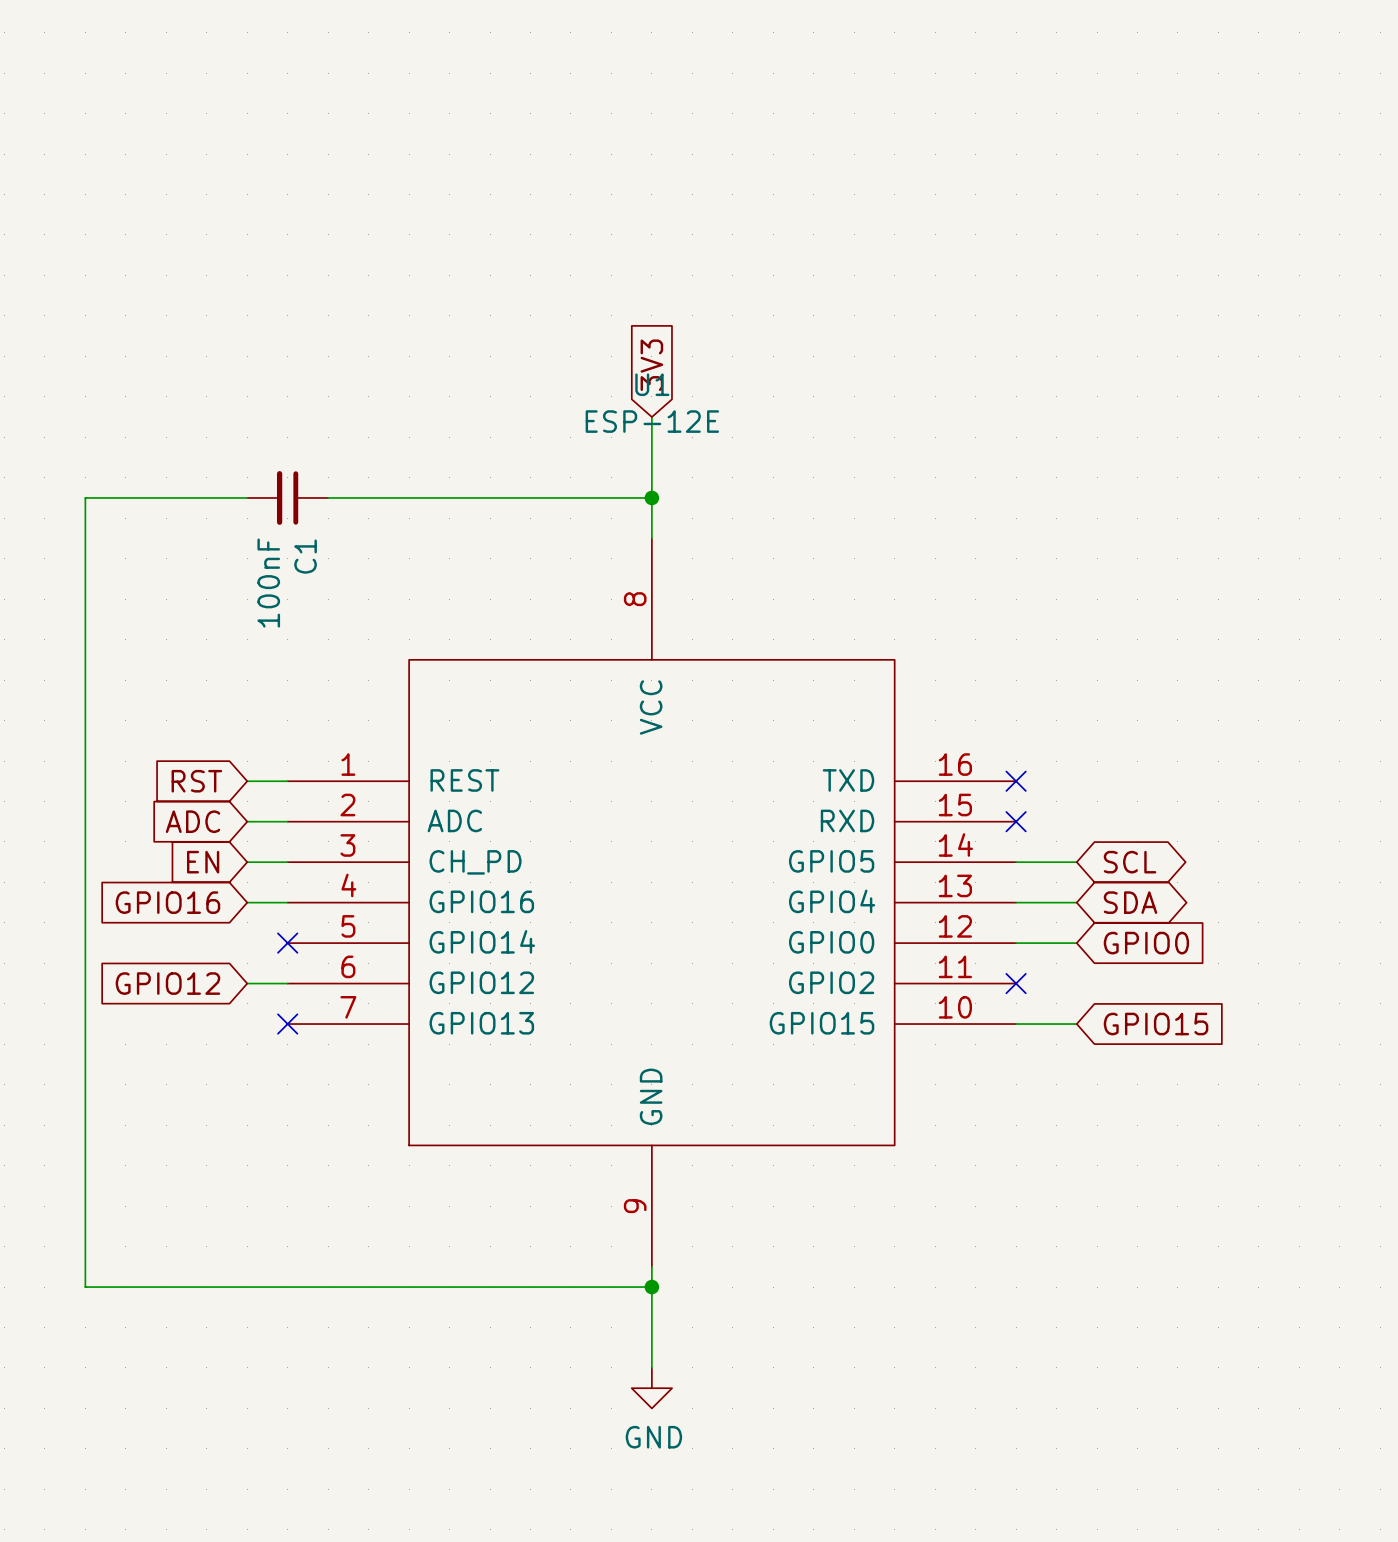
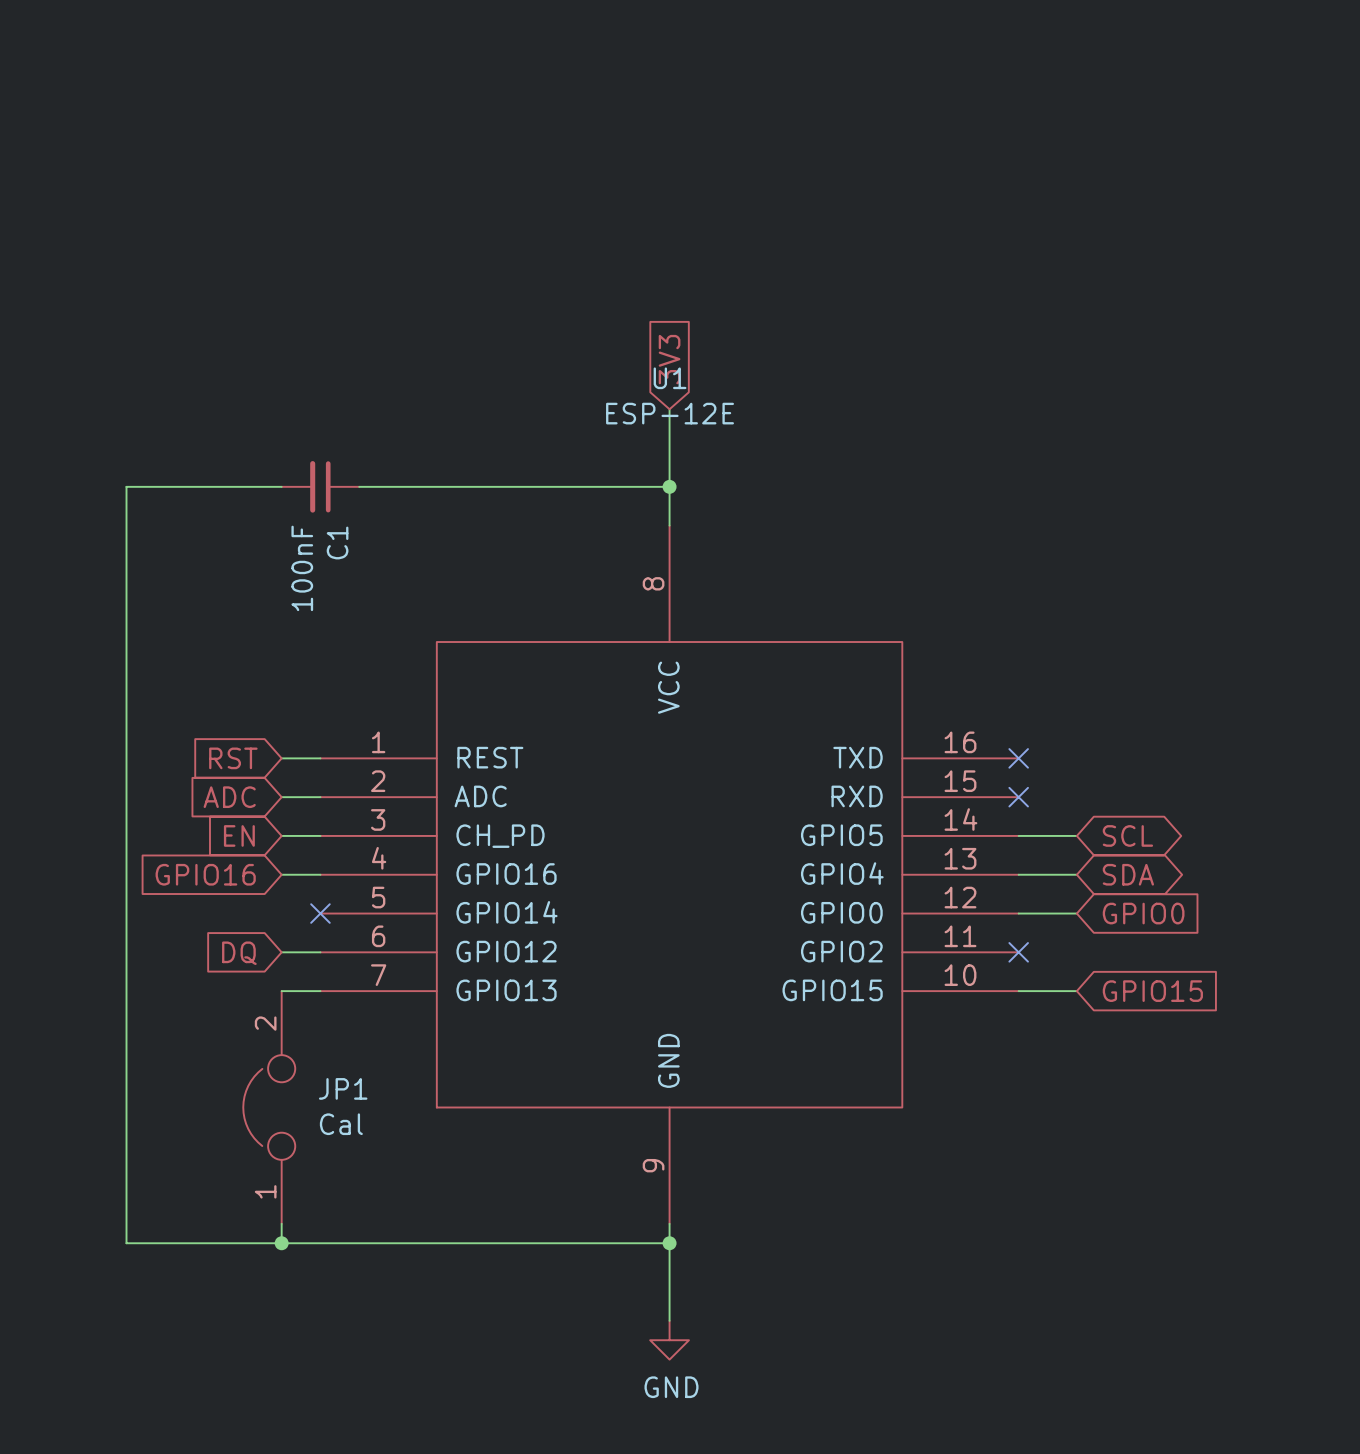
global label: GPIO12 (167, 983) -> DQ (239, 953)
wire: none -> (281, 991) (320, 991)
no-connect mark: (287, 1024) -> none
JP1: none -> Cal (269, 1107)
wire: none -> (281, 1223) (281, 1243)
junction: none -> (281, 1243)

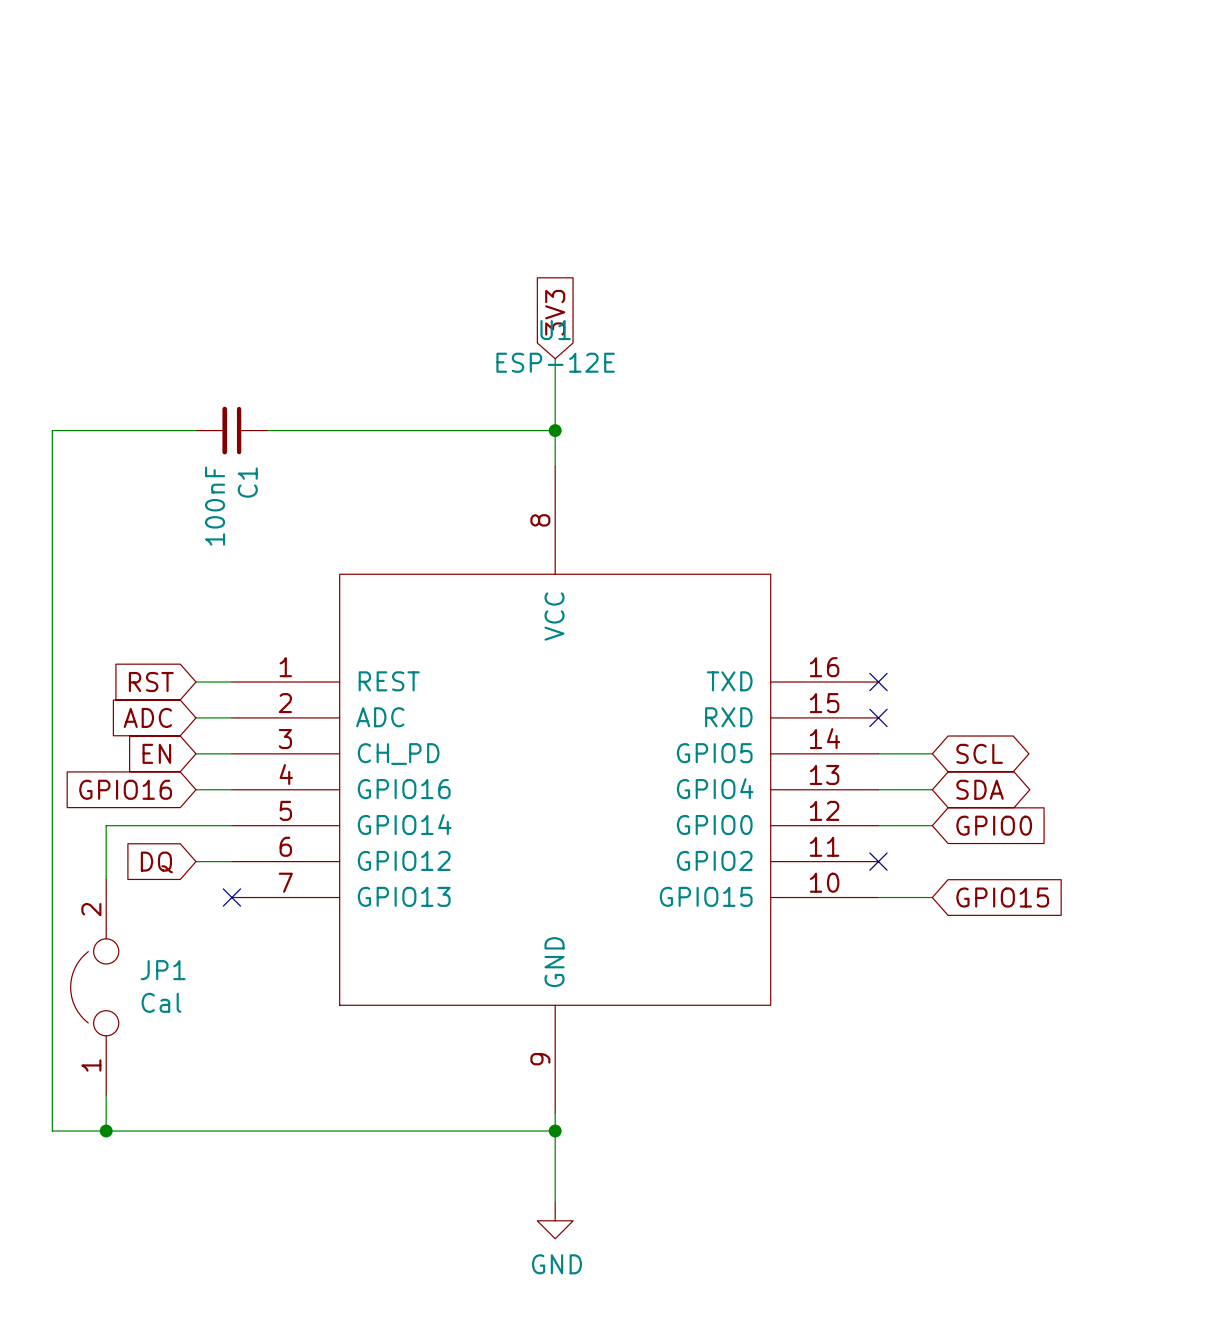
wire: none -> (231, 825) (106, 825) (106, 879)
no-connect mark position: (320, 913) -> (231, 897)
wire: (281, 991) (320, 991) -> none
JP1 position: (269, 1107) -> (94, 987)
wire: none -> (106, 1095) (106, 1131)
wire: (281, 1223) (281, 1243) -> none
junction: none -> (106, 1131)
junction: (281, 1243) -> none

